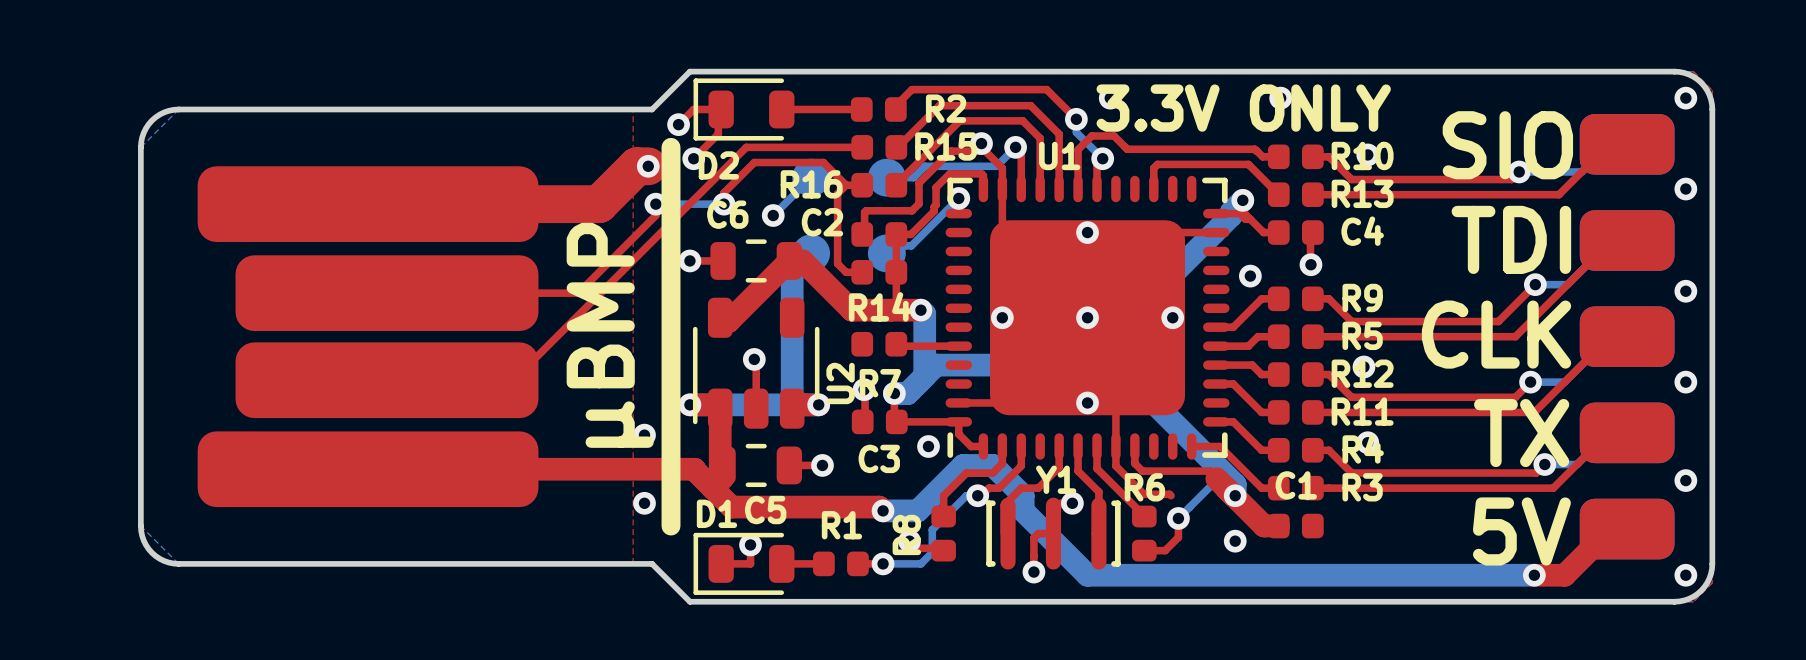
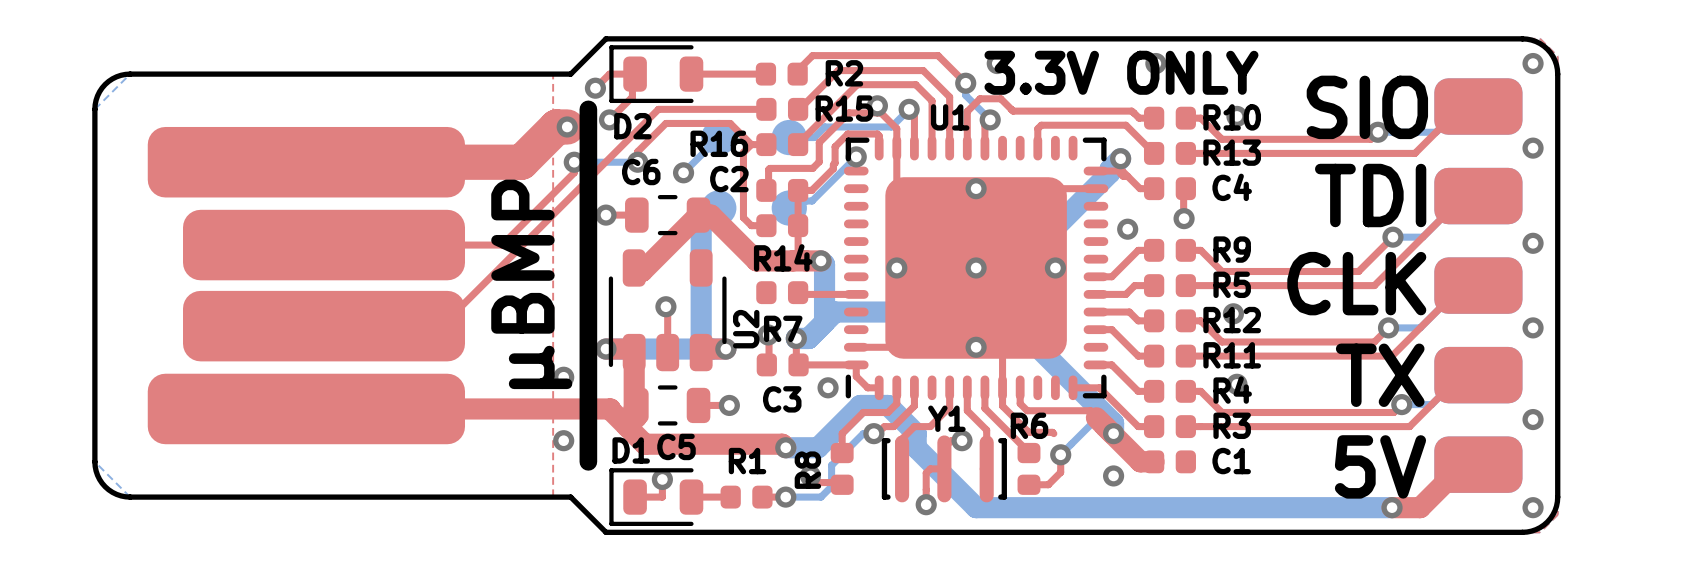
C1 name position: C1 (1296, 485) -> C1 (1231, 461)

